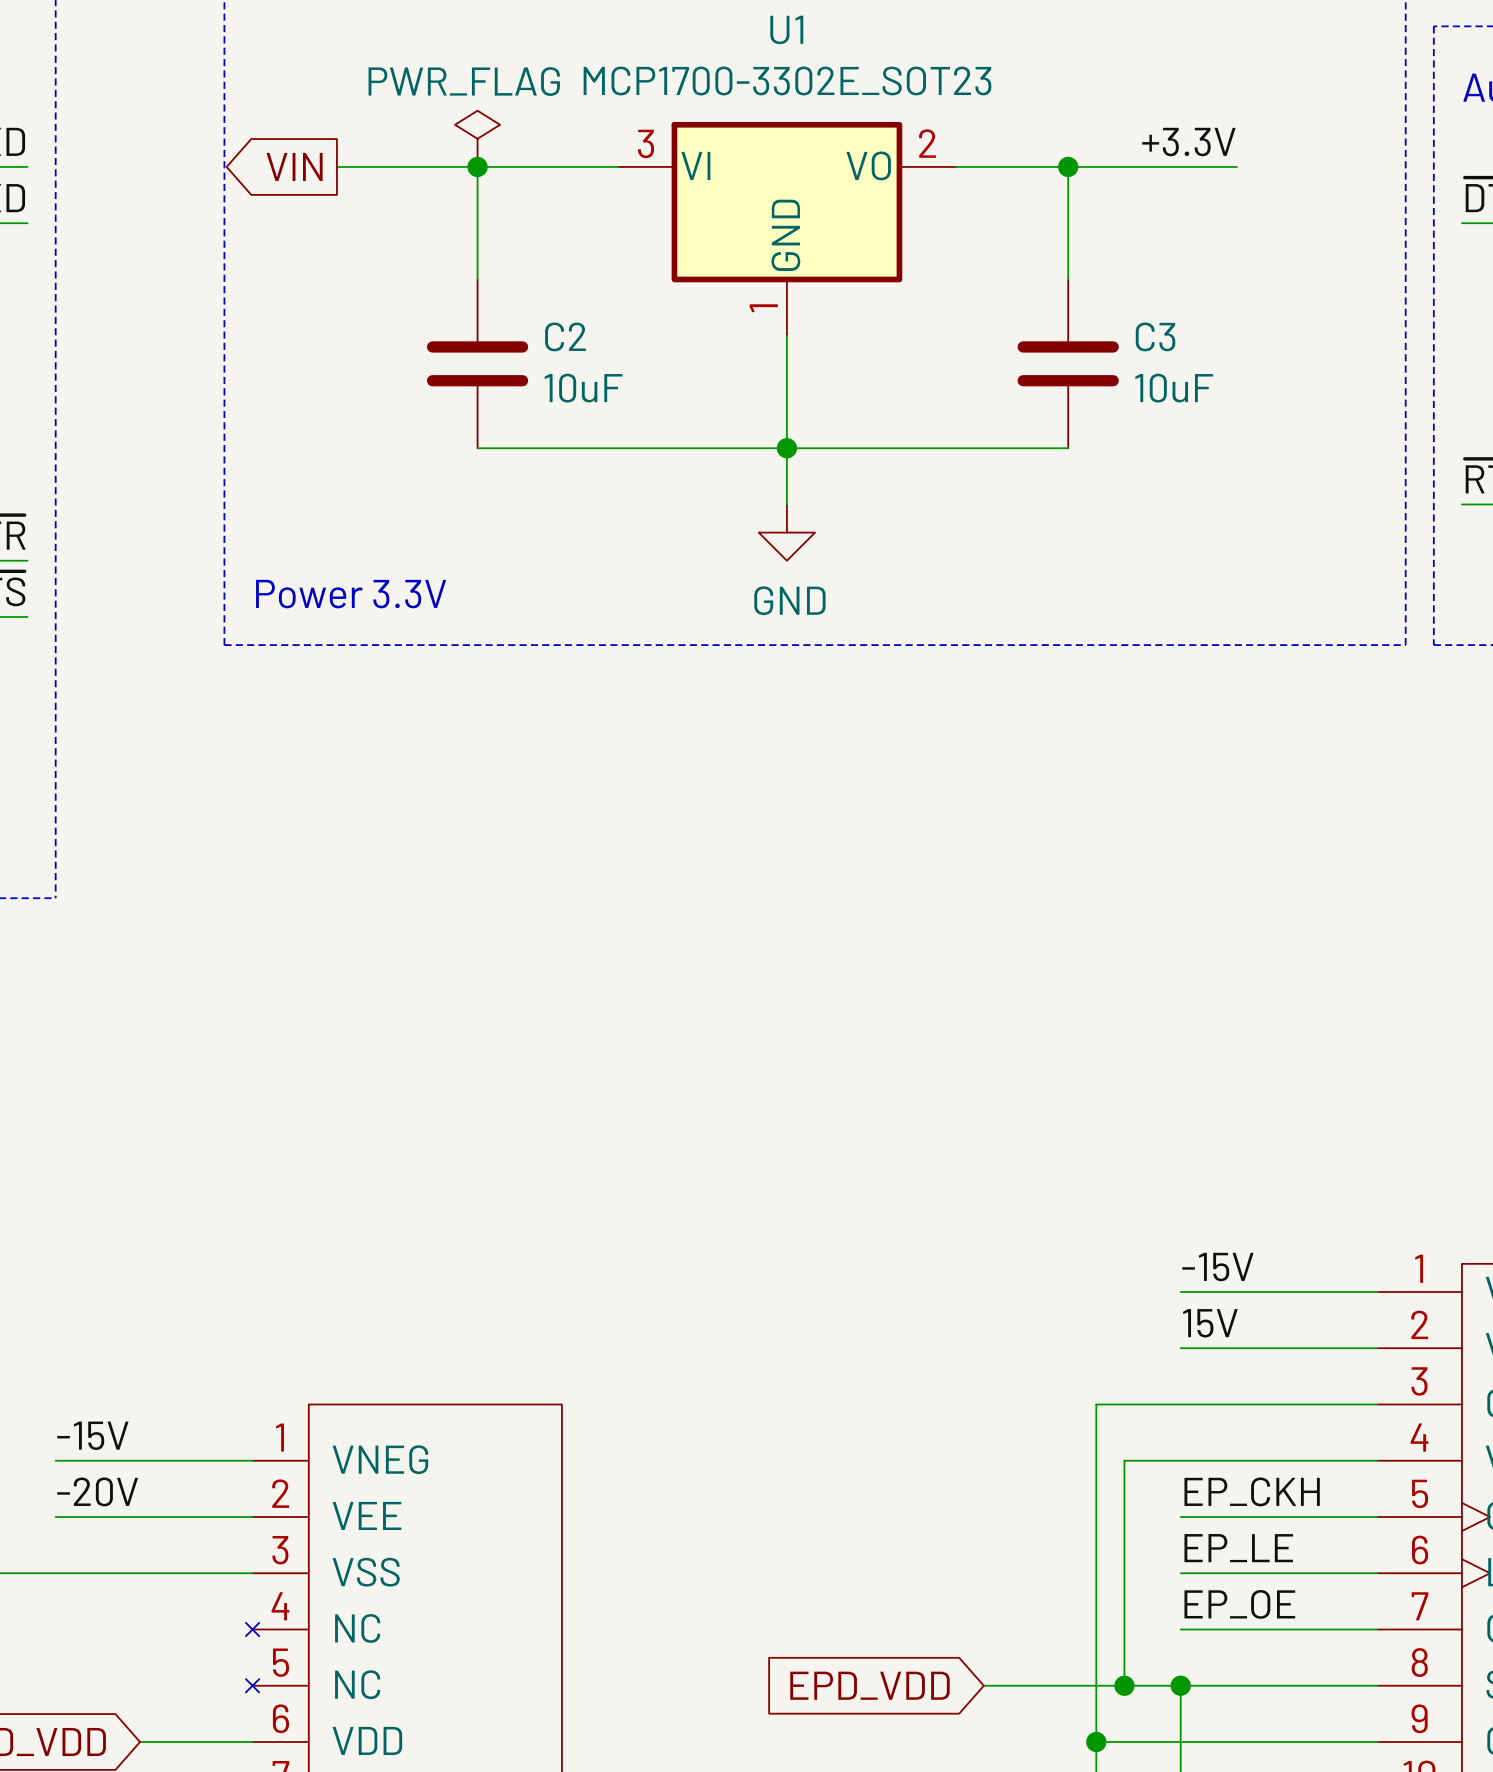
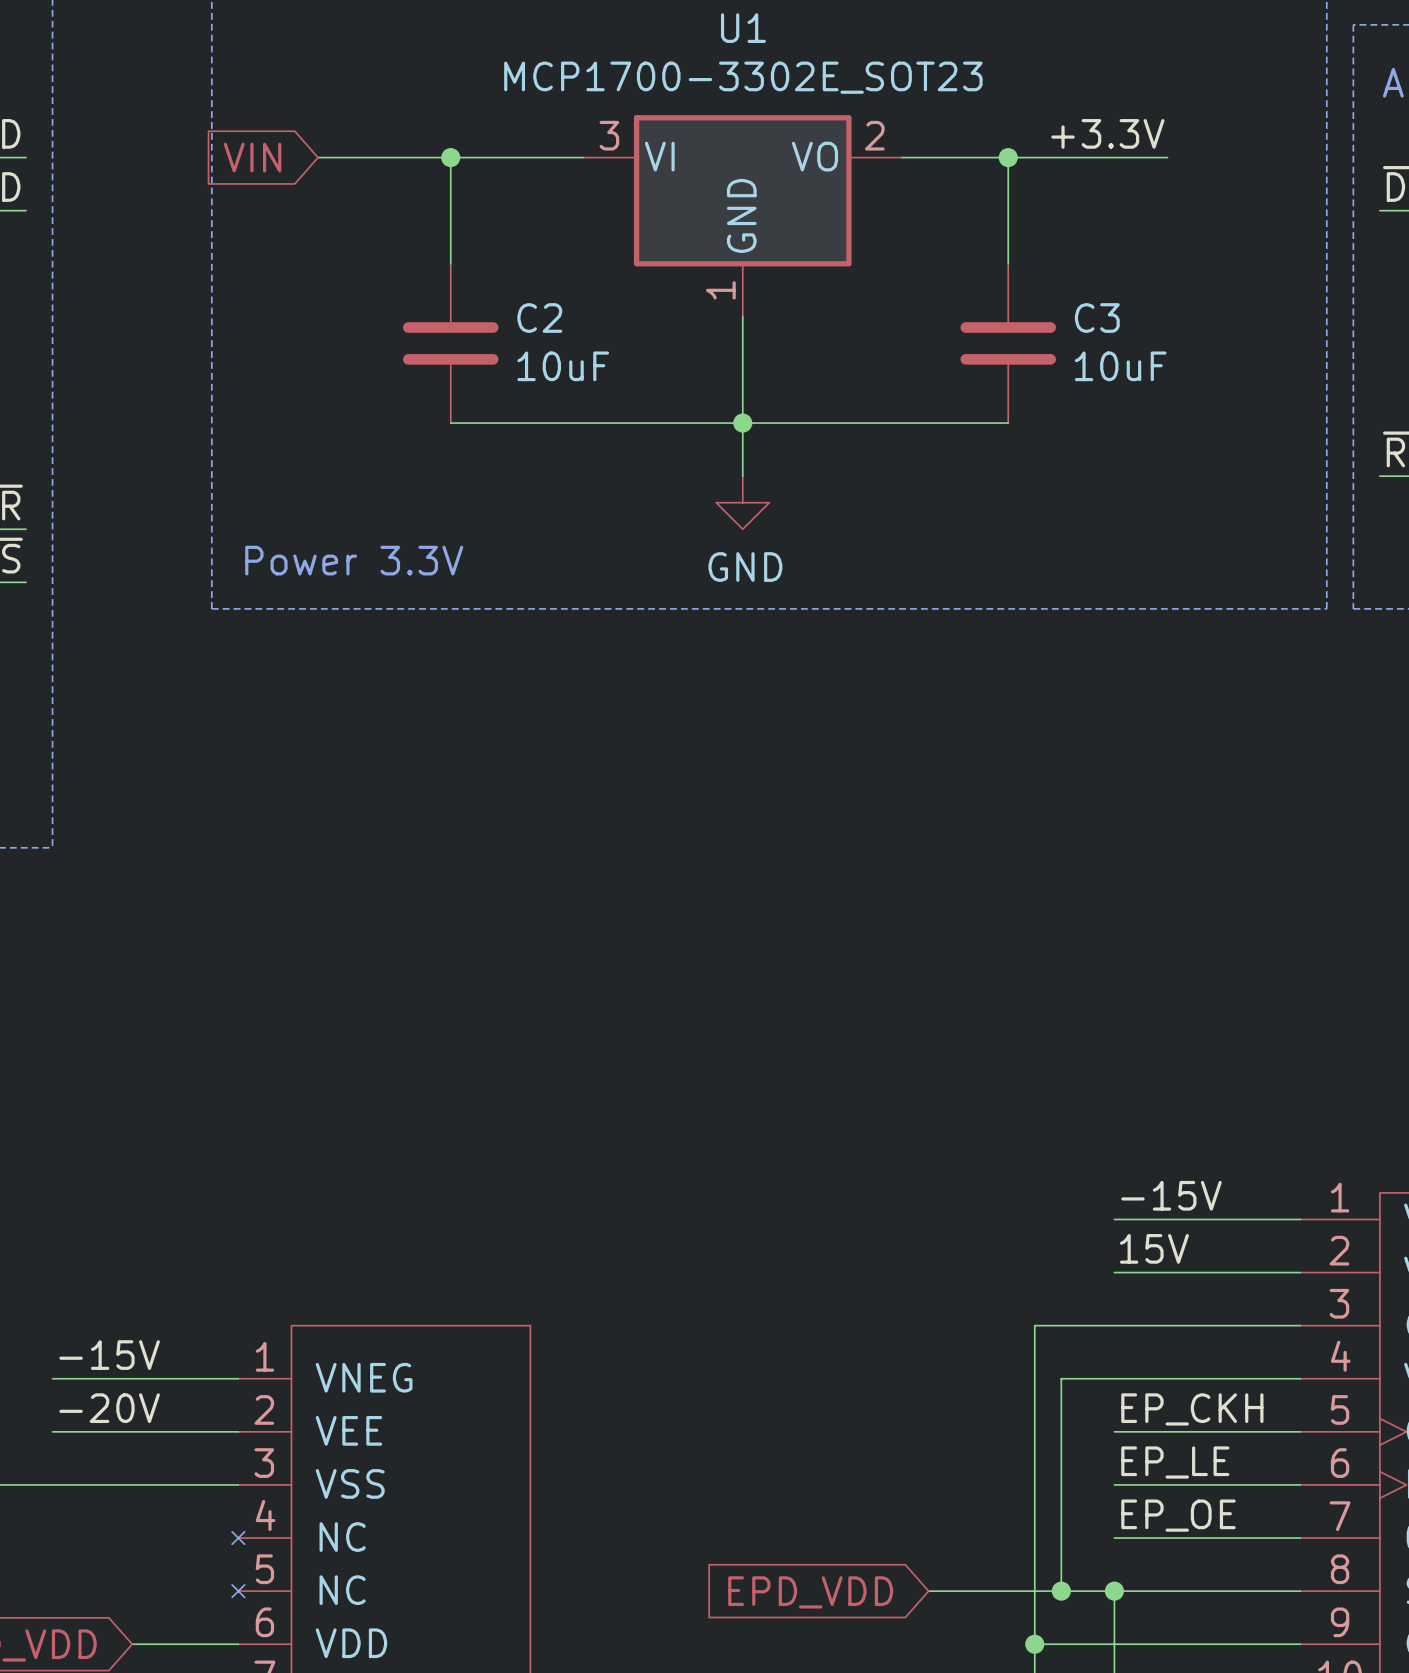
power symbol: PWR_FLAG (477, 138) -> none
global label shape: output (294, 166) -> input (252, 157)

